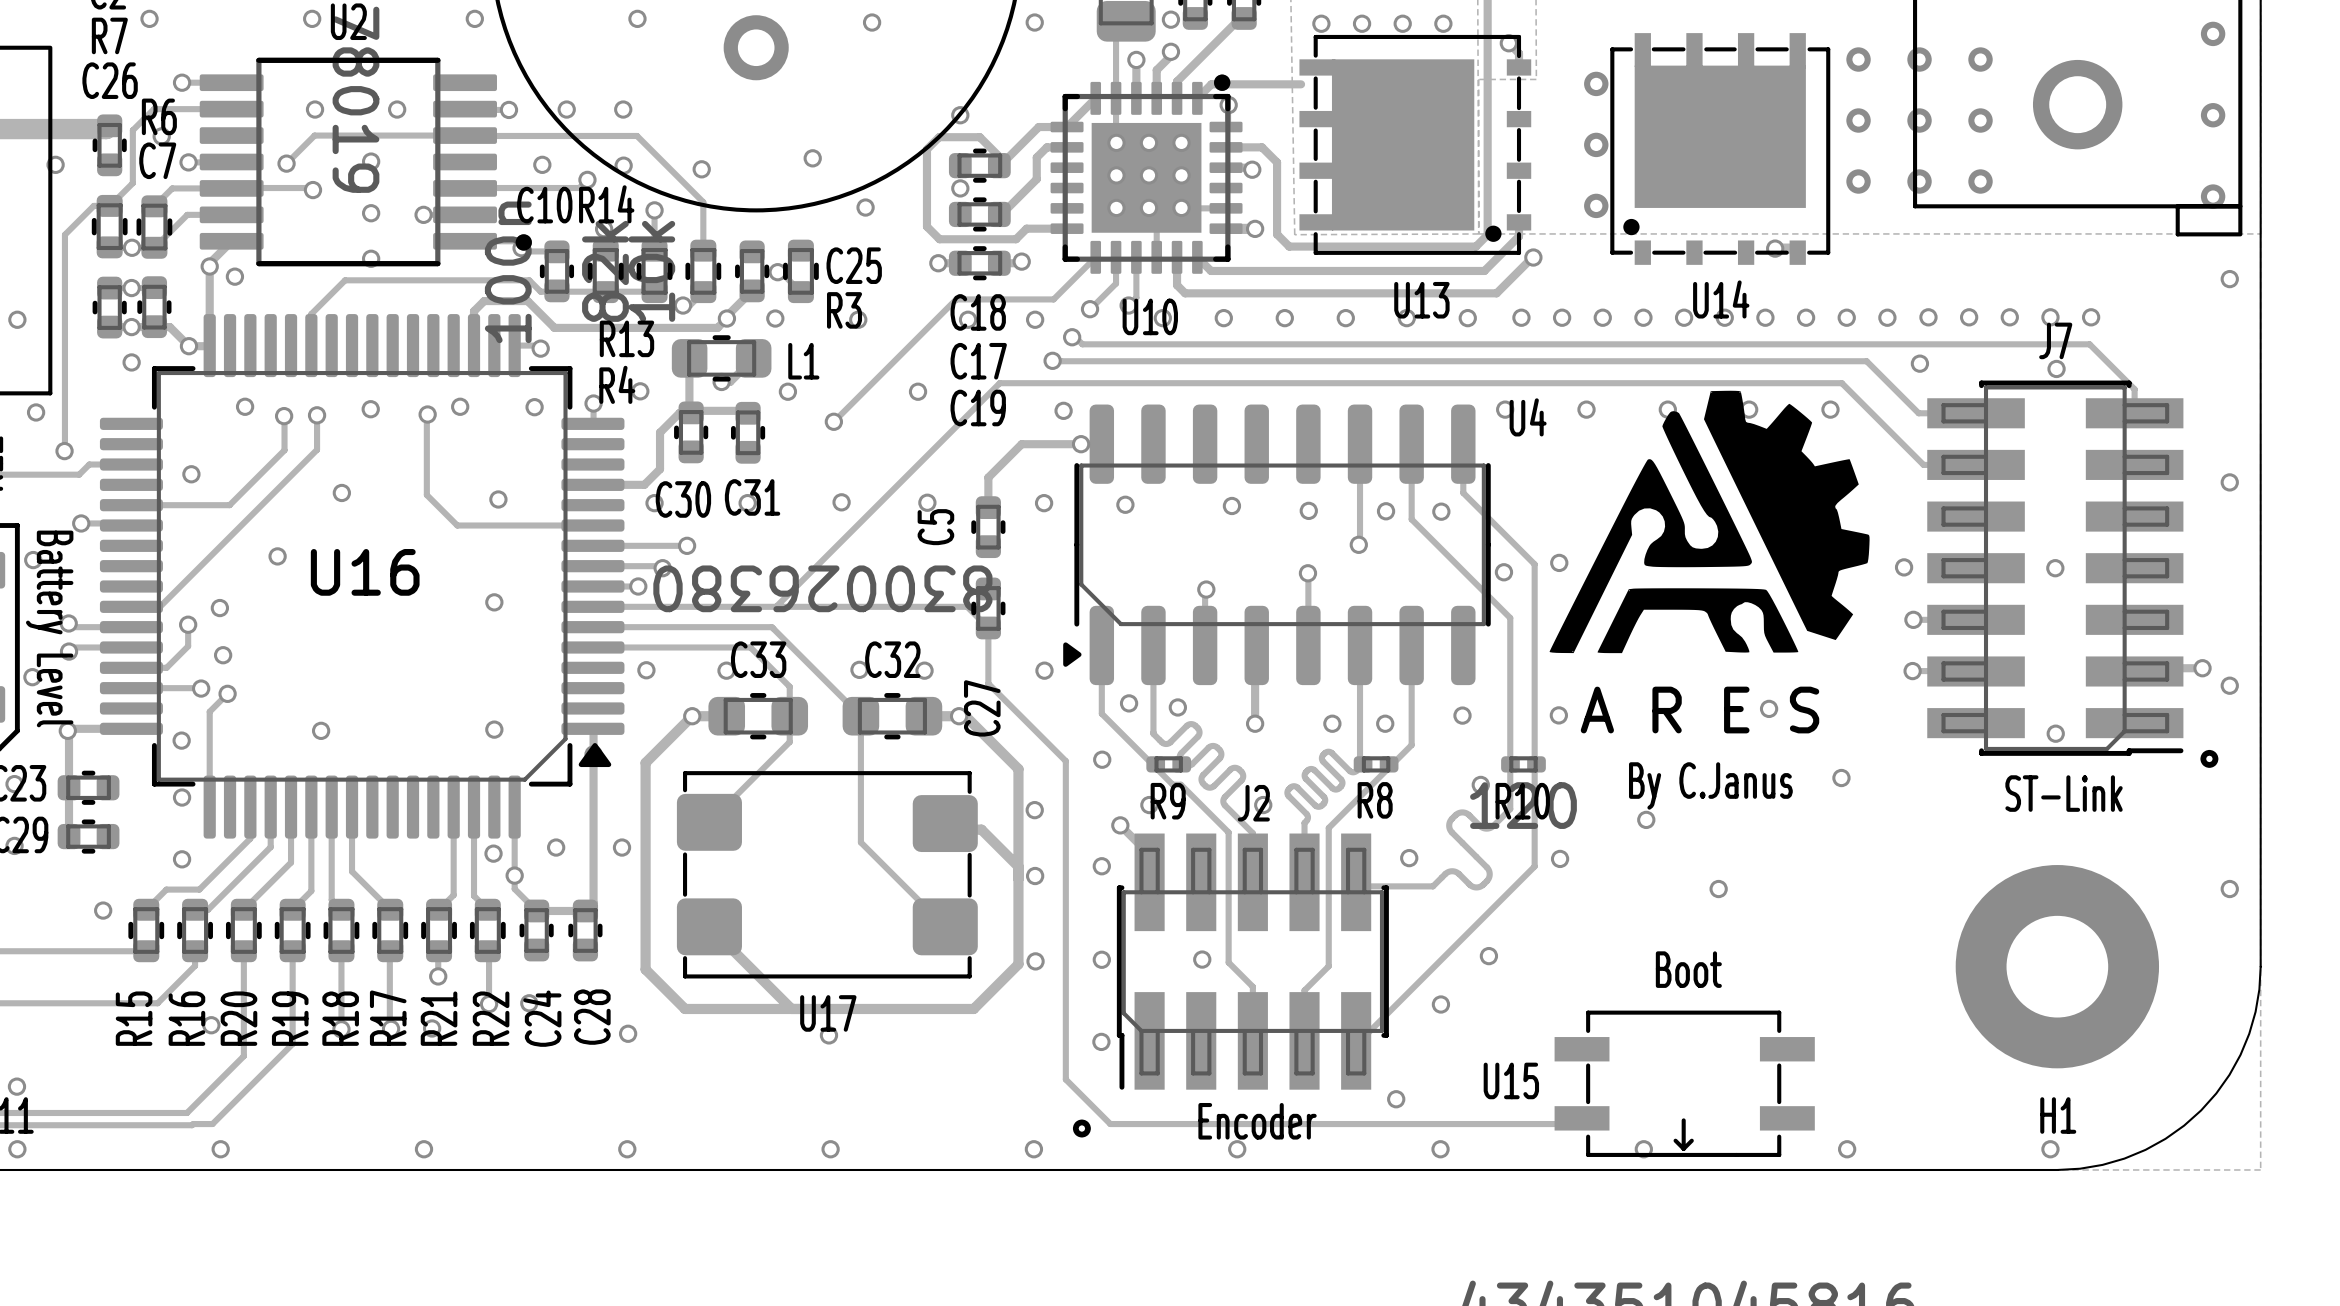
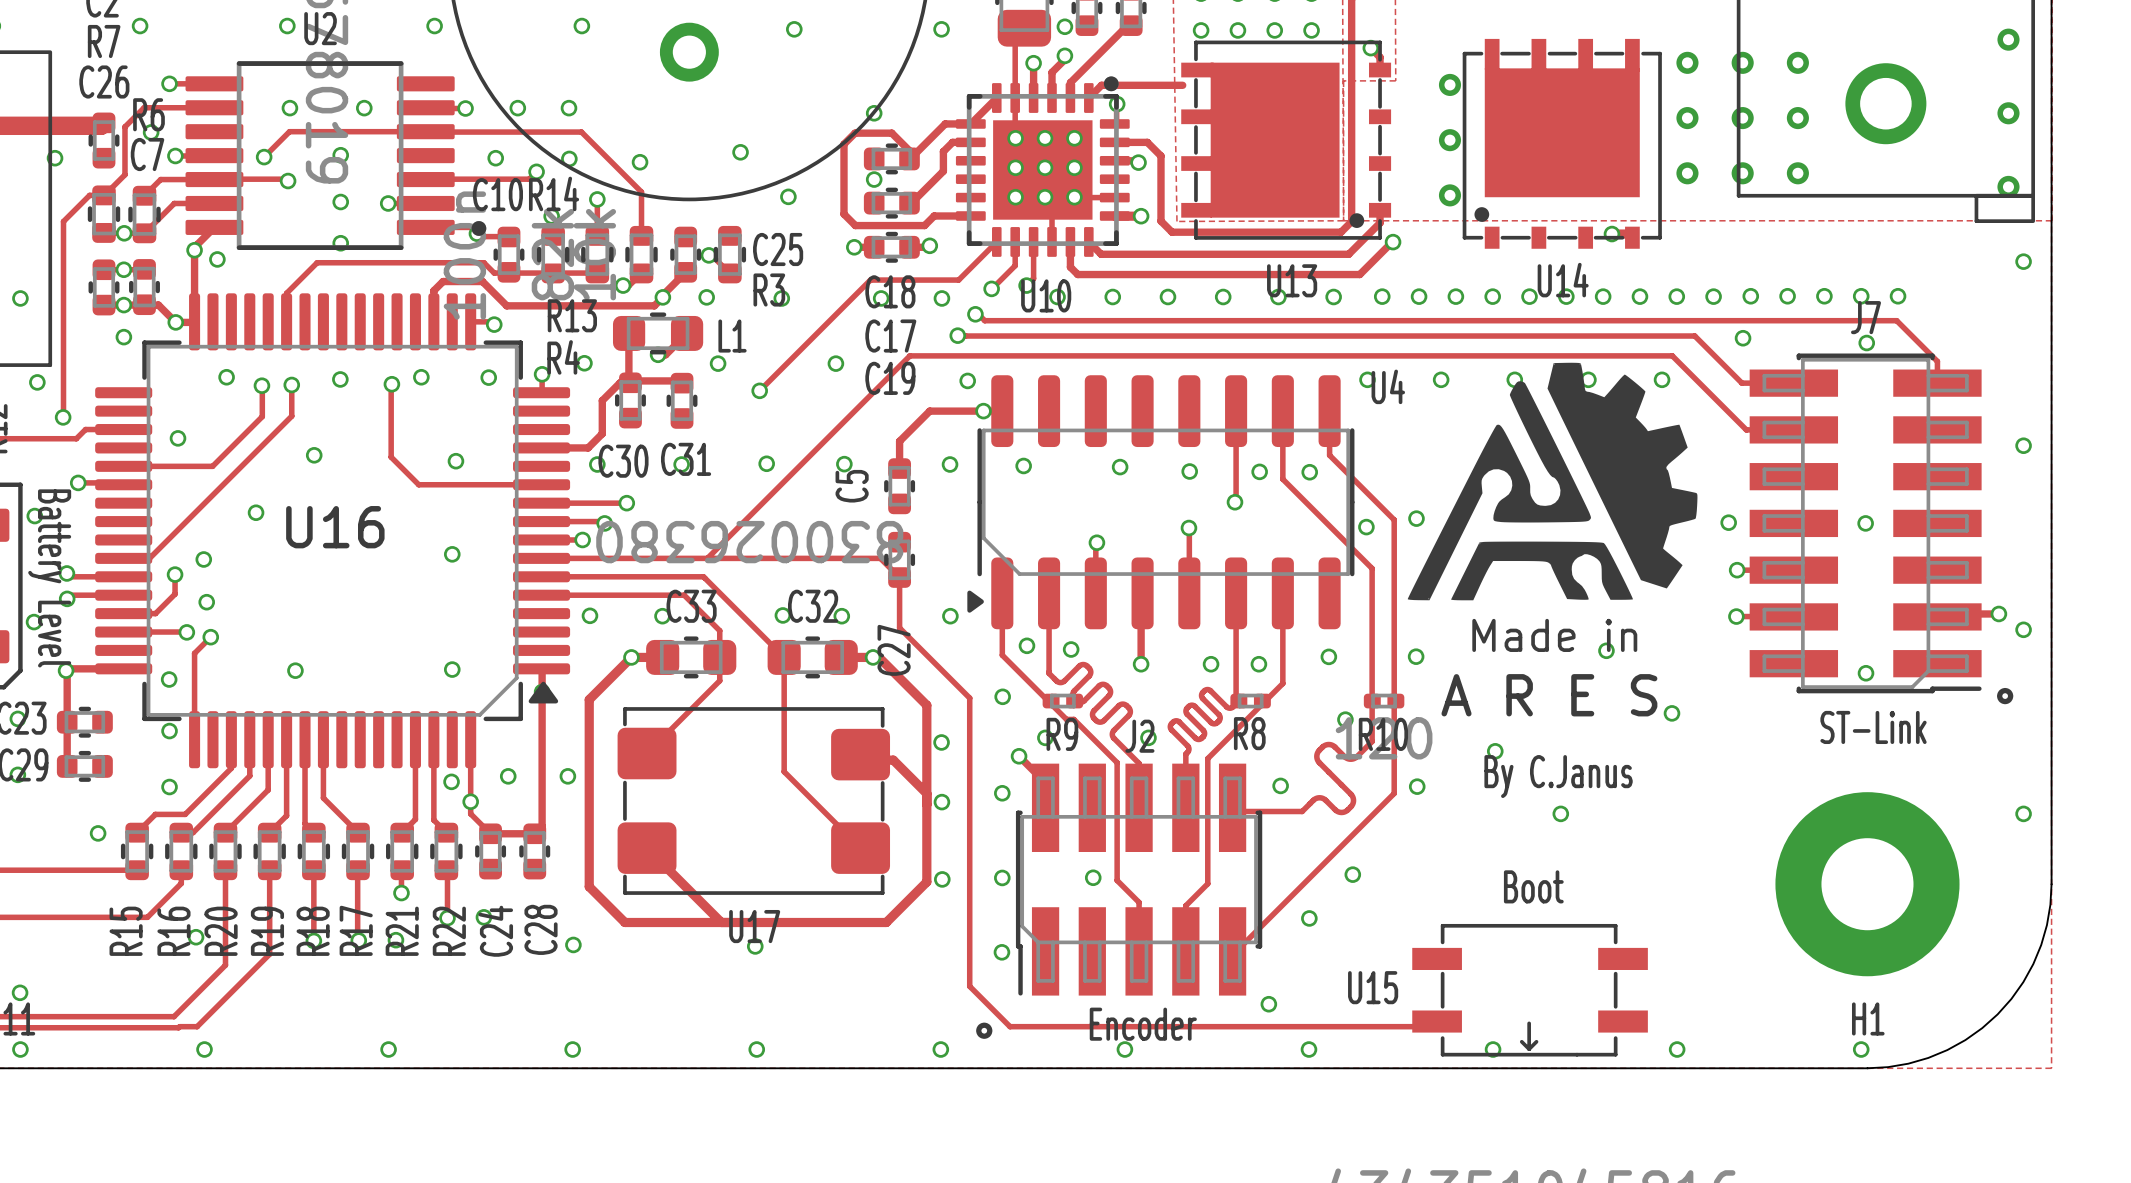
text: none -> Made in (1554, 635)
text position: A R E S (1699, 710) -> A R E S (1549, 695)
text position: By C.Janus (1710, 785) -> By C.Janus (1558, 776)

